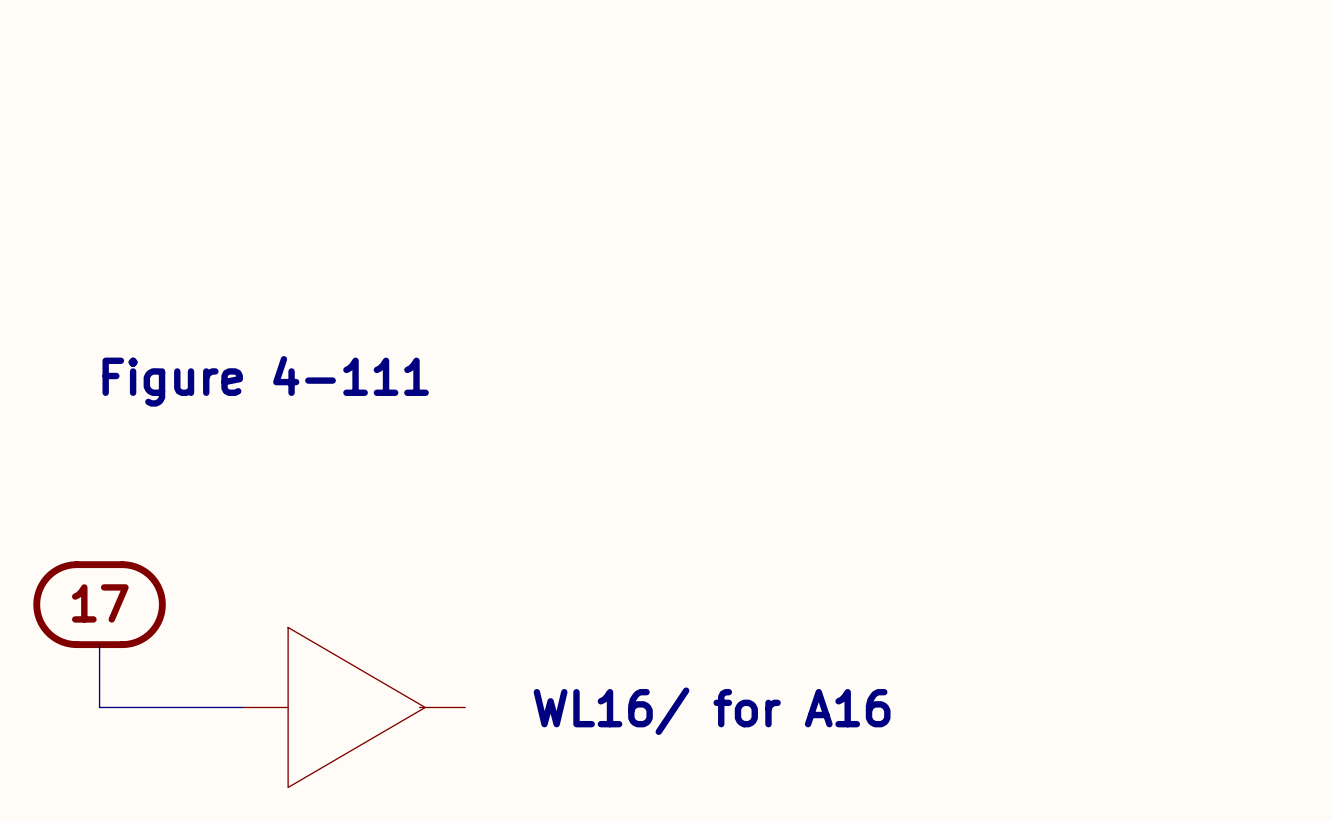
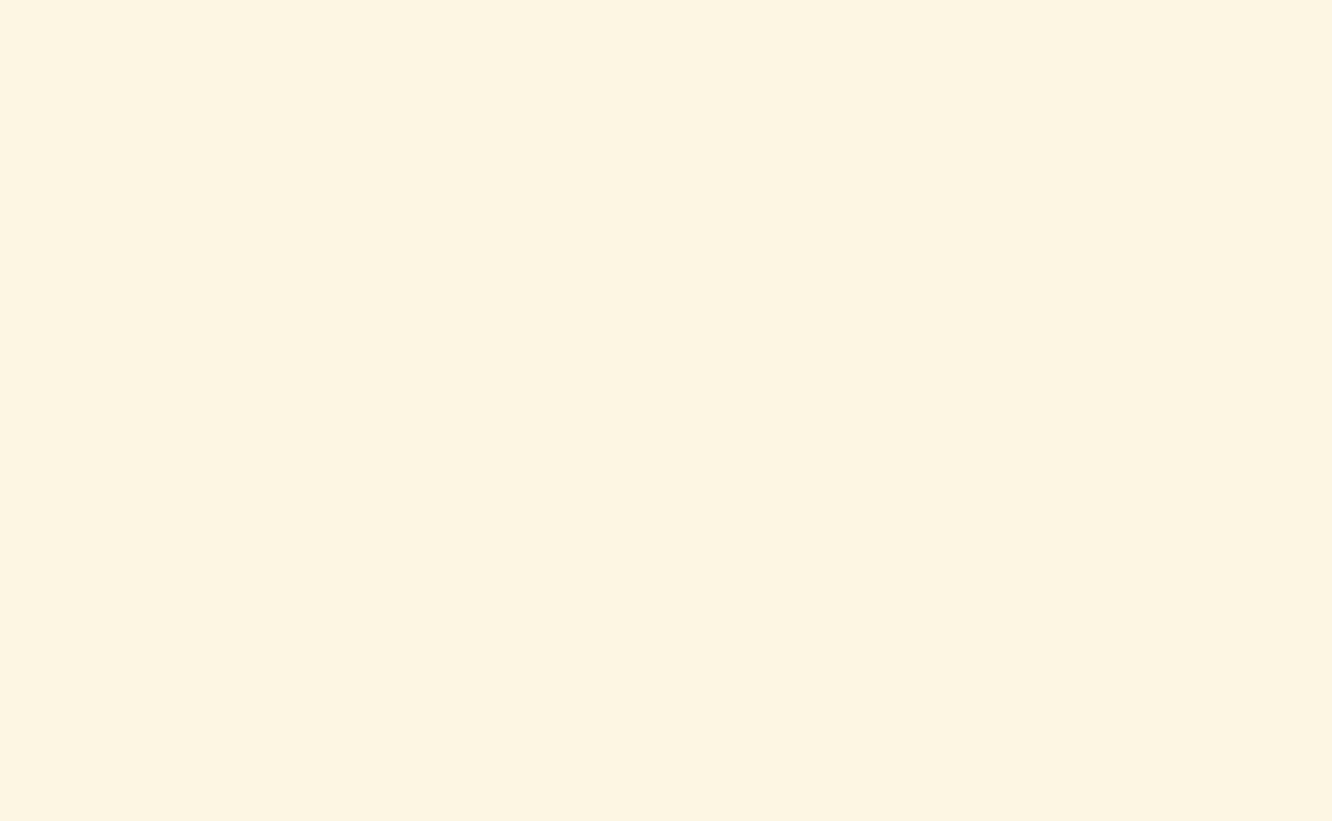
text: Figure 4-111 (265, 381) -> none
part: (99, 604) -> none
wire: (99, 644) (99, 707) (242, 707) -> none
part: (353, 707) -> none
text: WL16/ for A16 (712, 711) -> none

